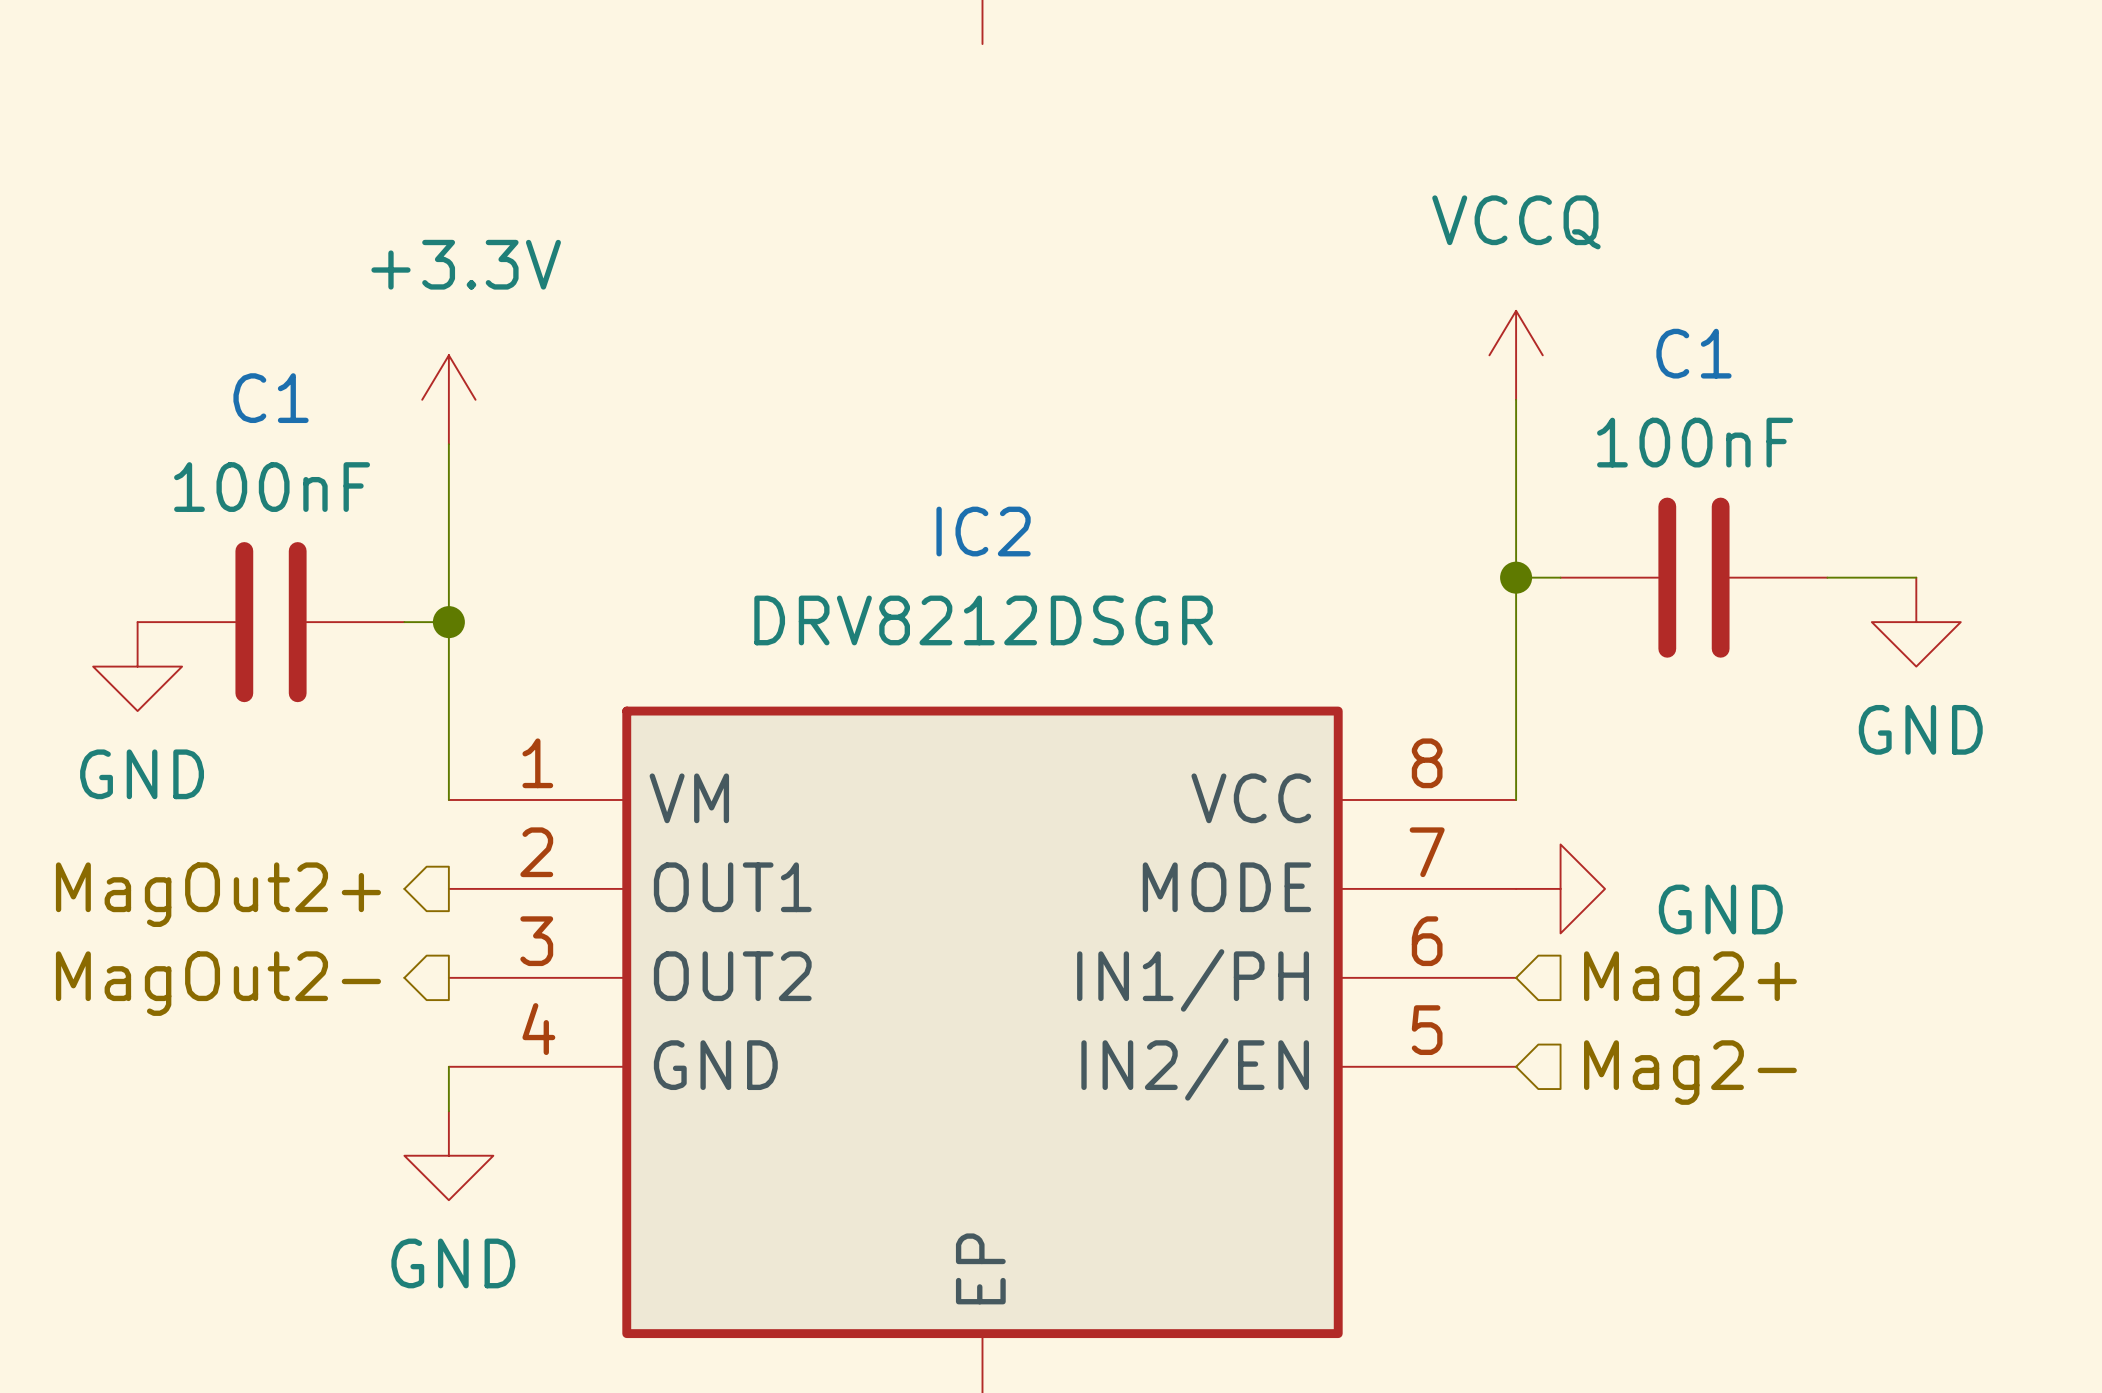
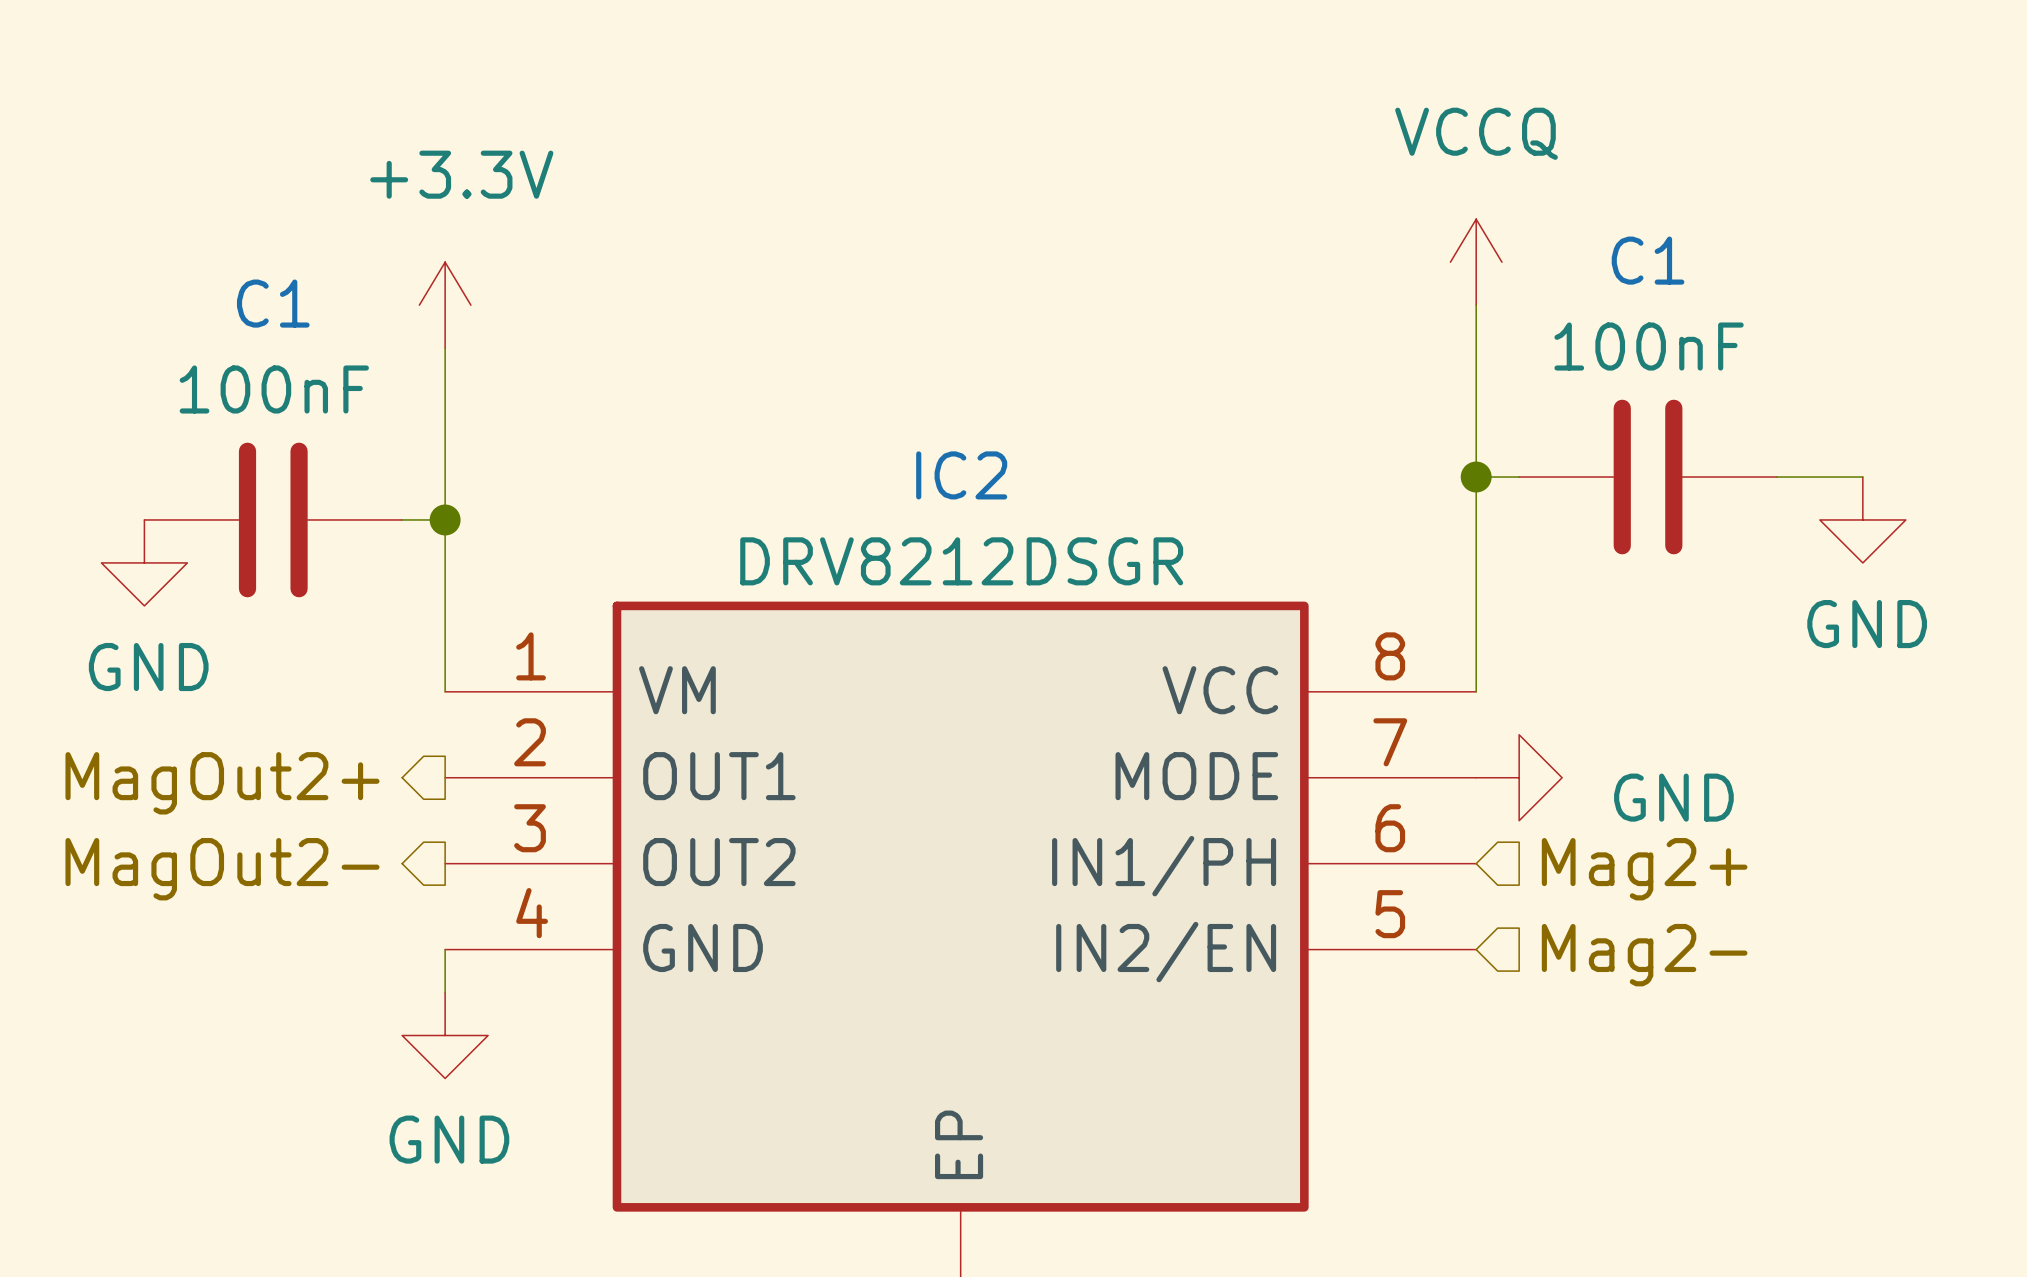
IC2 name position: IC2 (983, 531) -> IC2 (961, 475)
IC2 value position: DRV8212DSGR (983, 620) -> DRV8212DSGR (961, 561)

